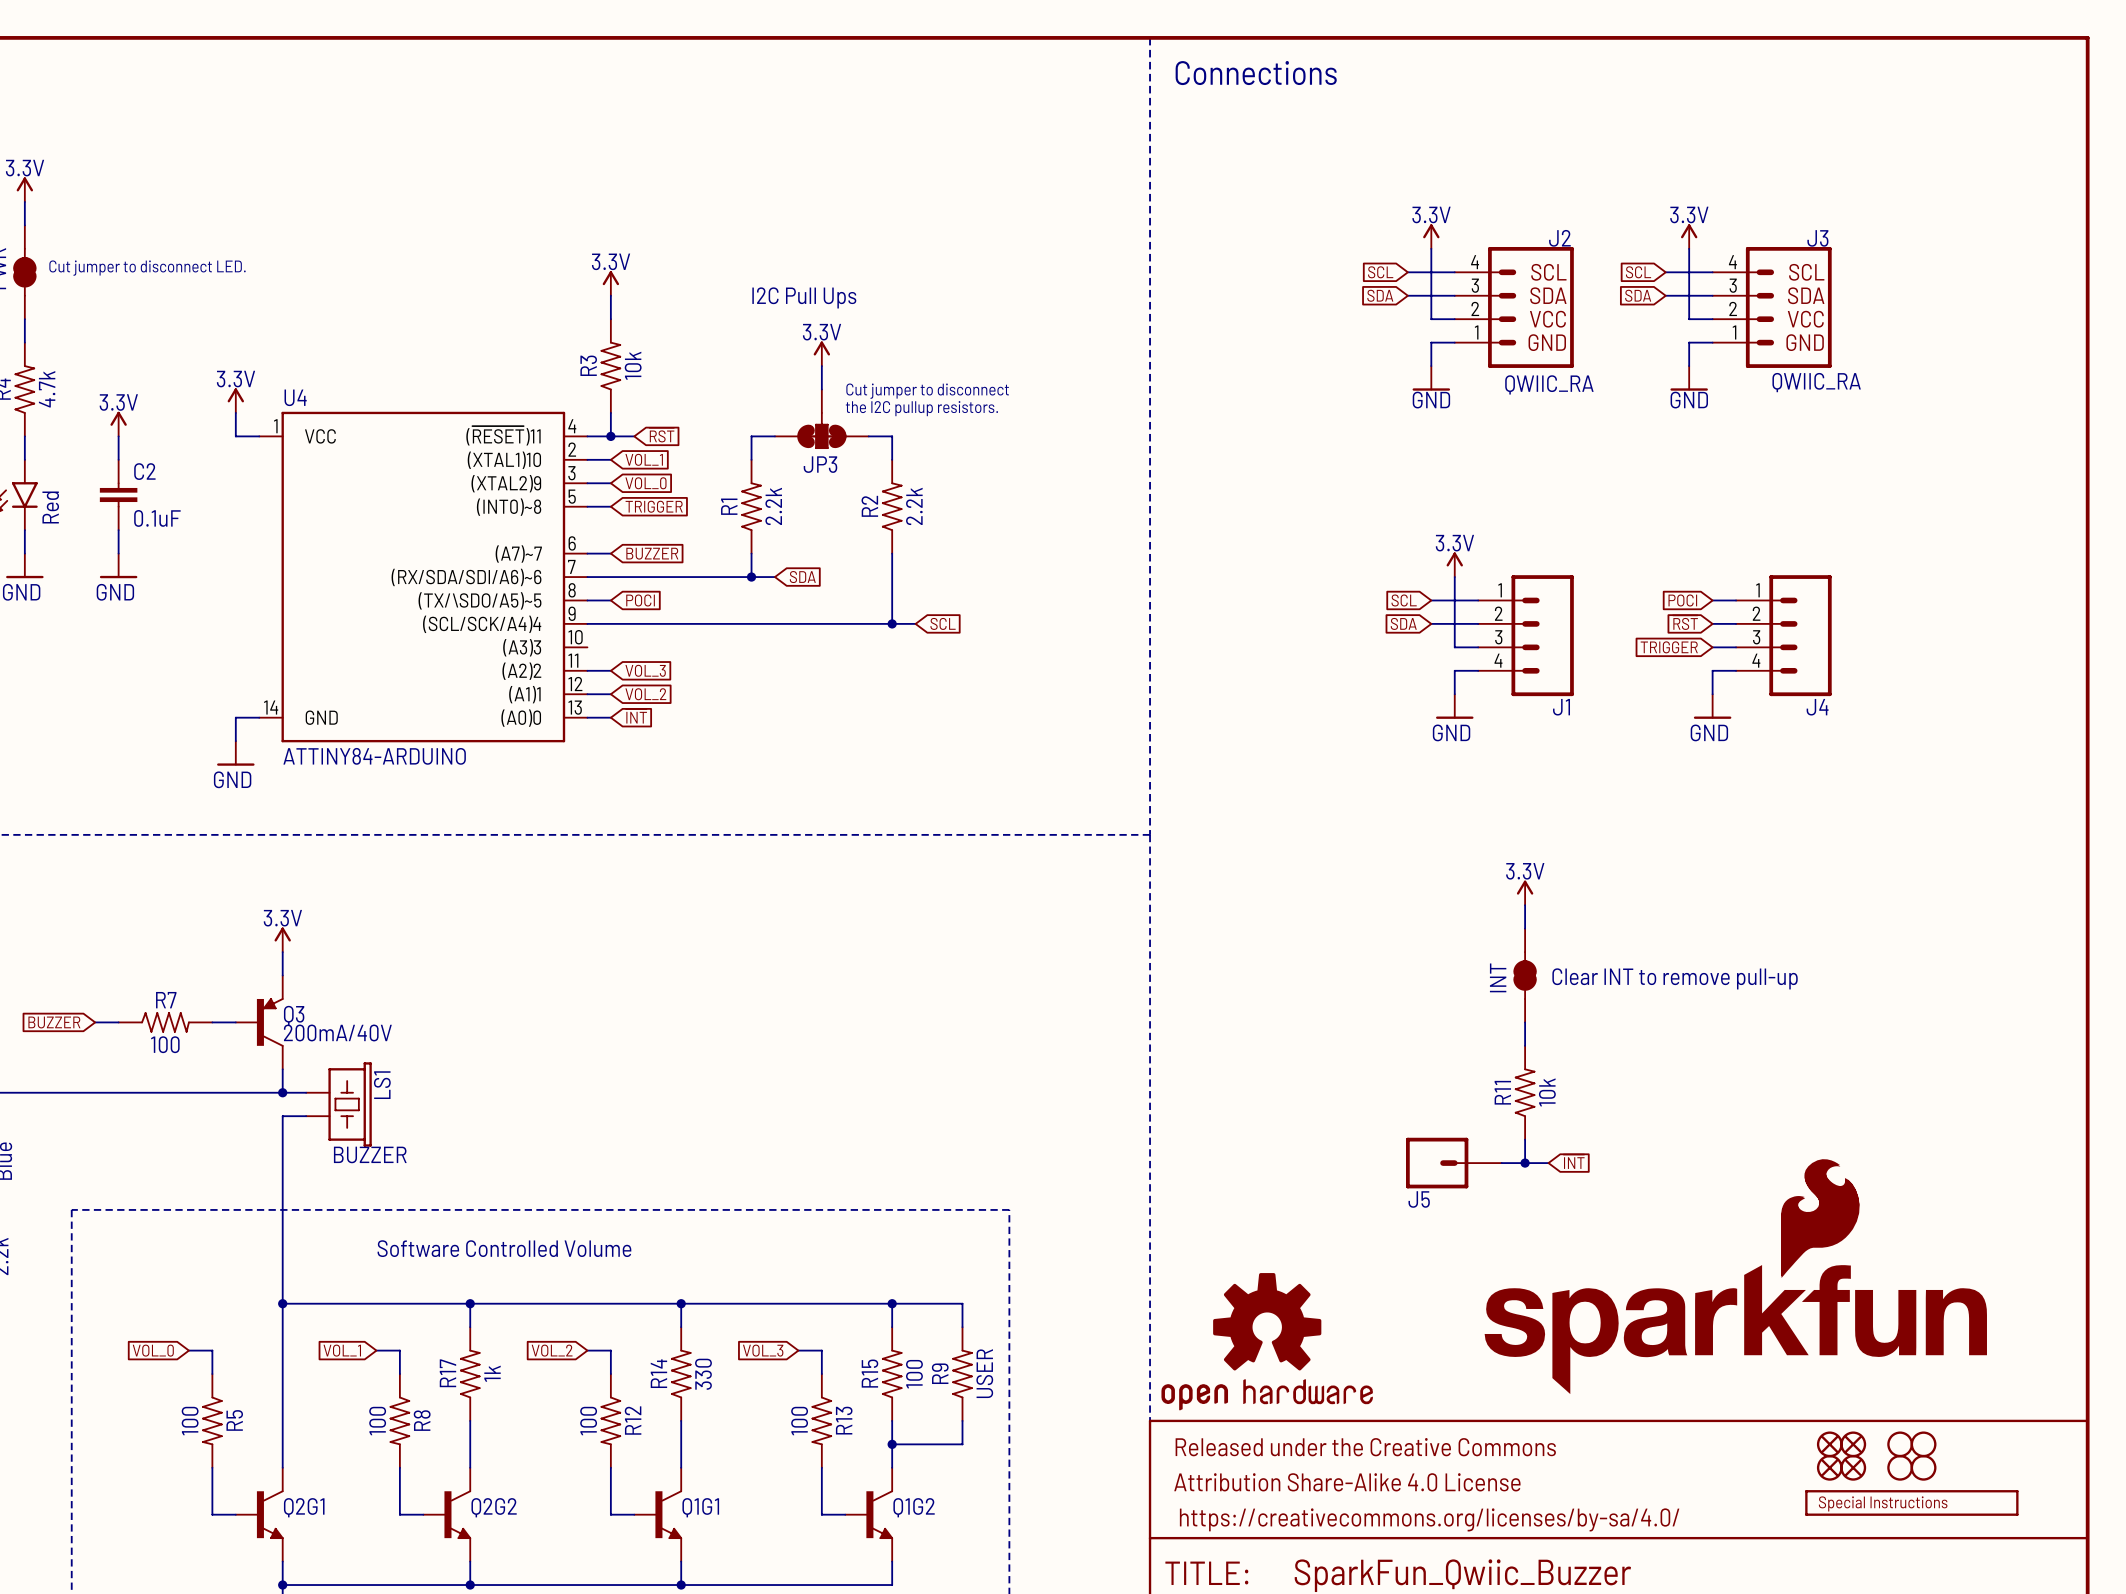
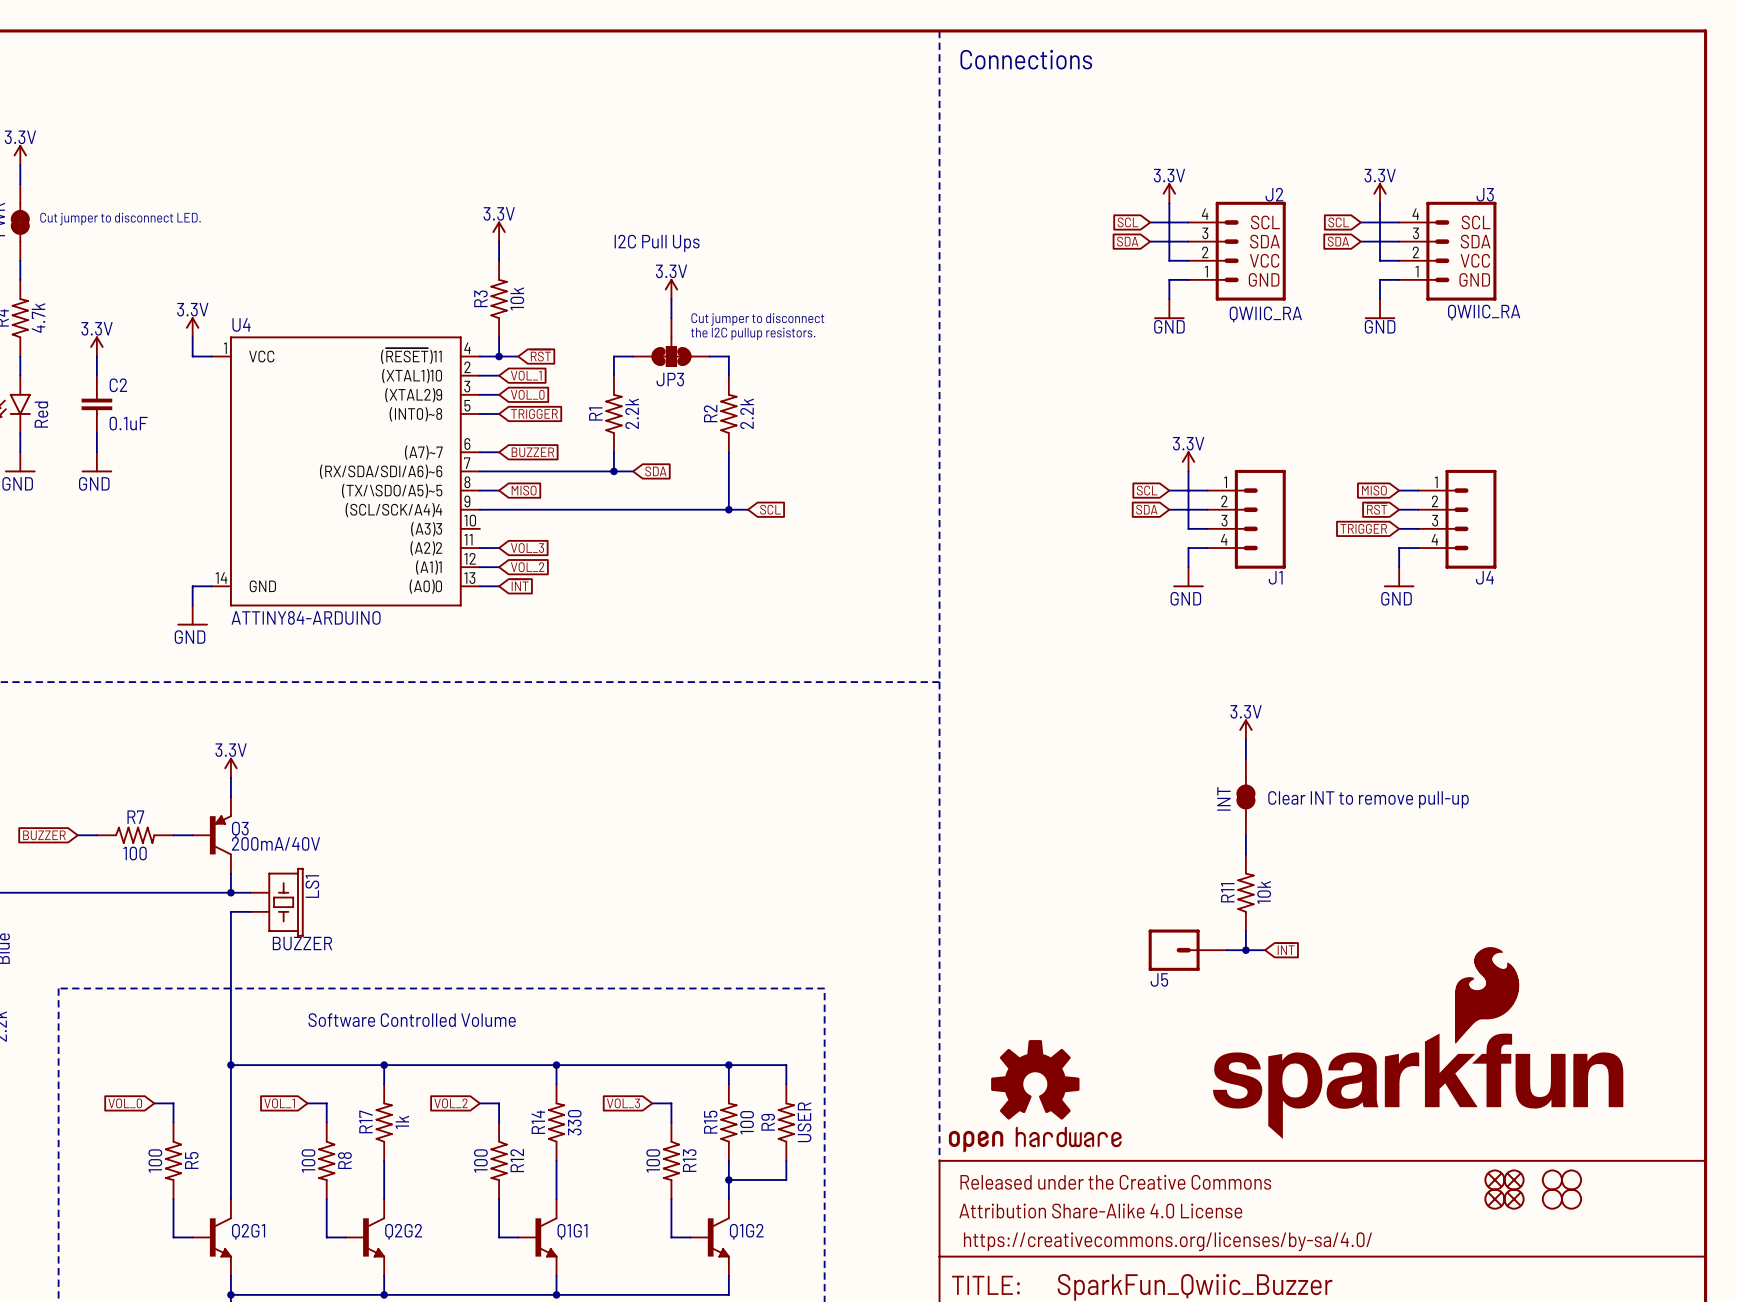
global label: POCI (640, 600) -> MISO (524, 490)
global label: POCI (1682, 600) -> MISO (1374, 490)
part: (1911, 1502) -> none

